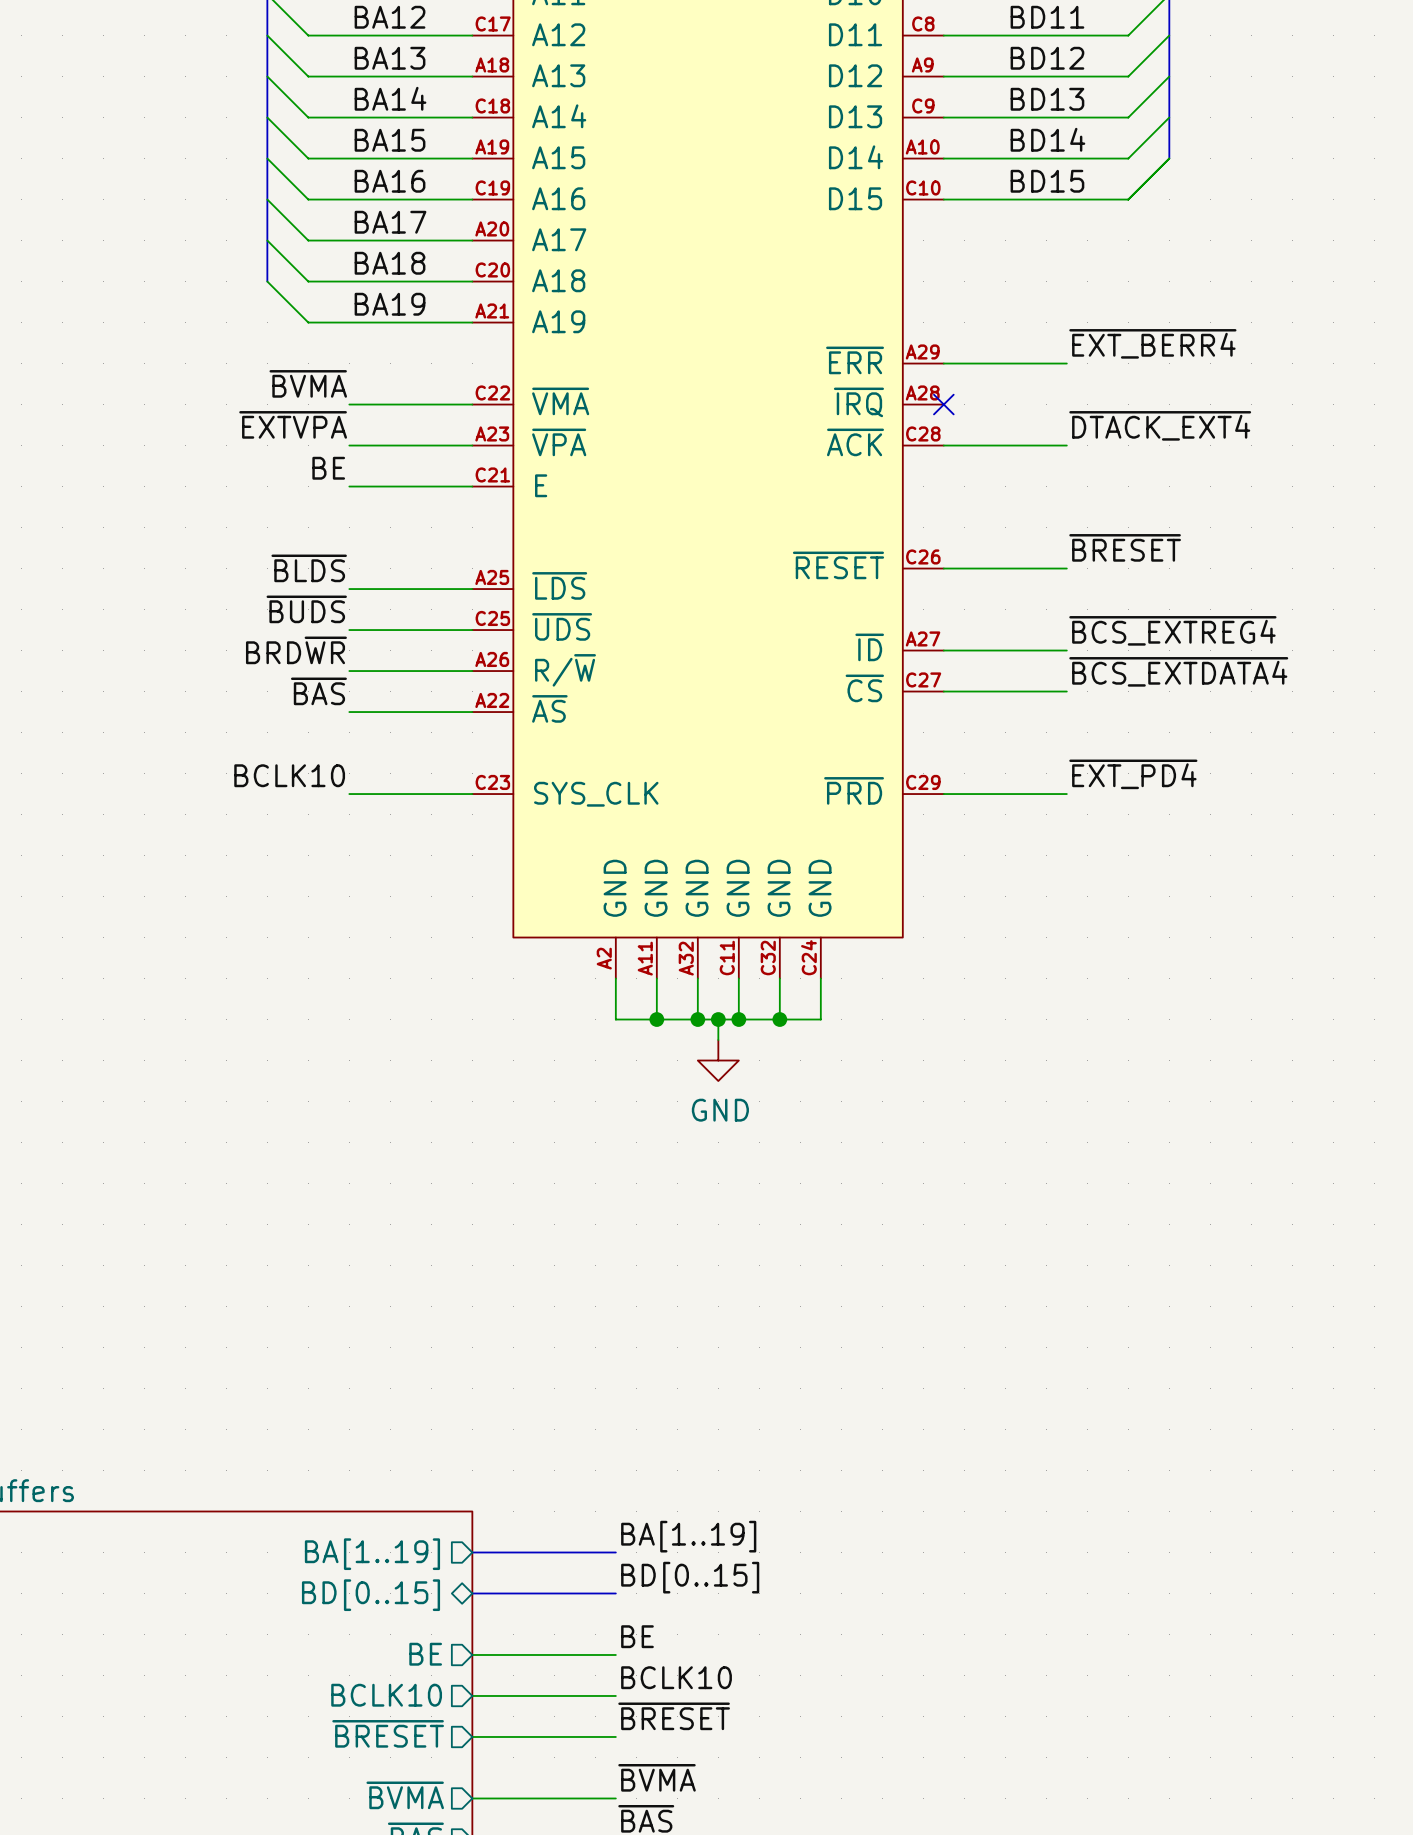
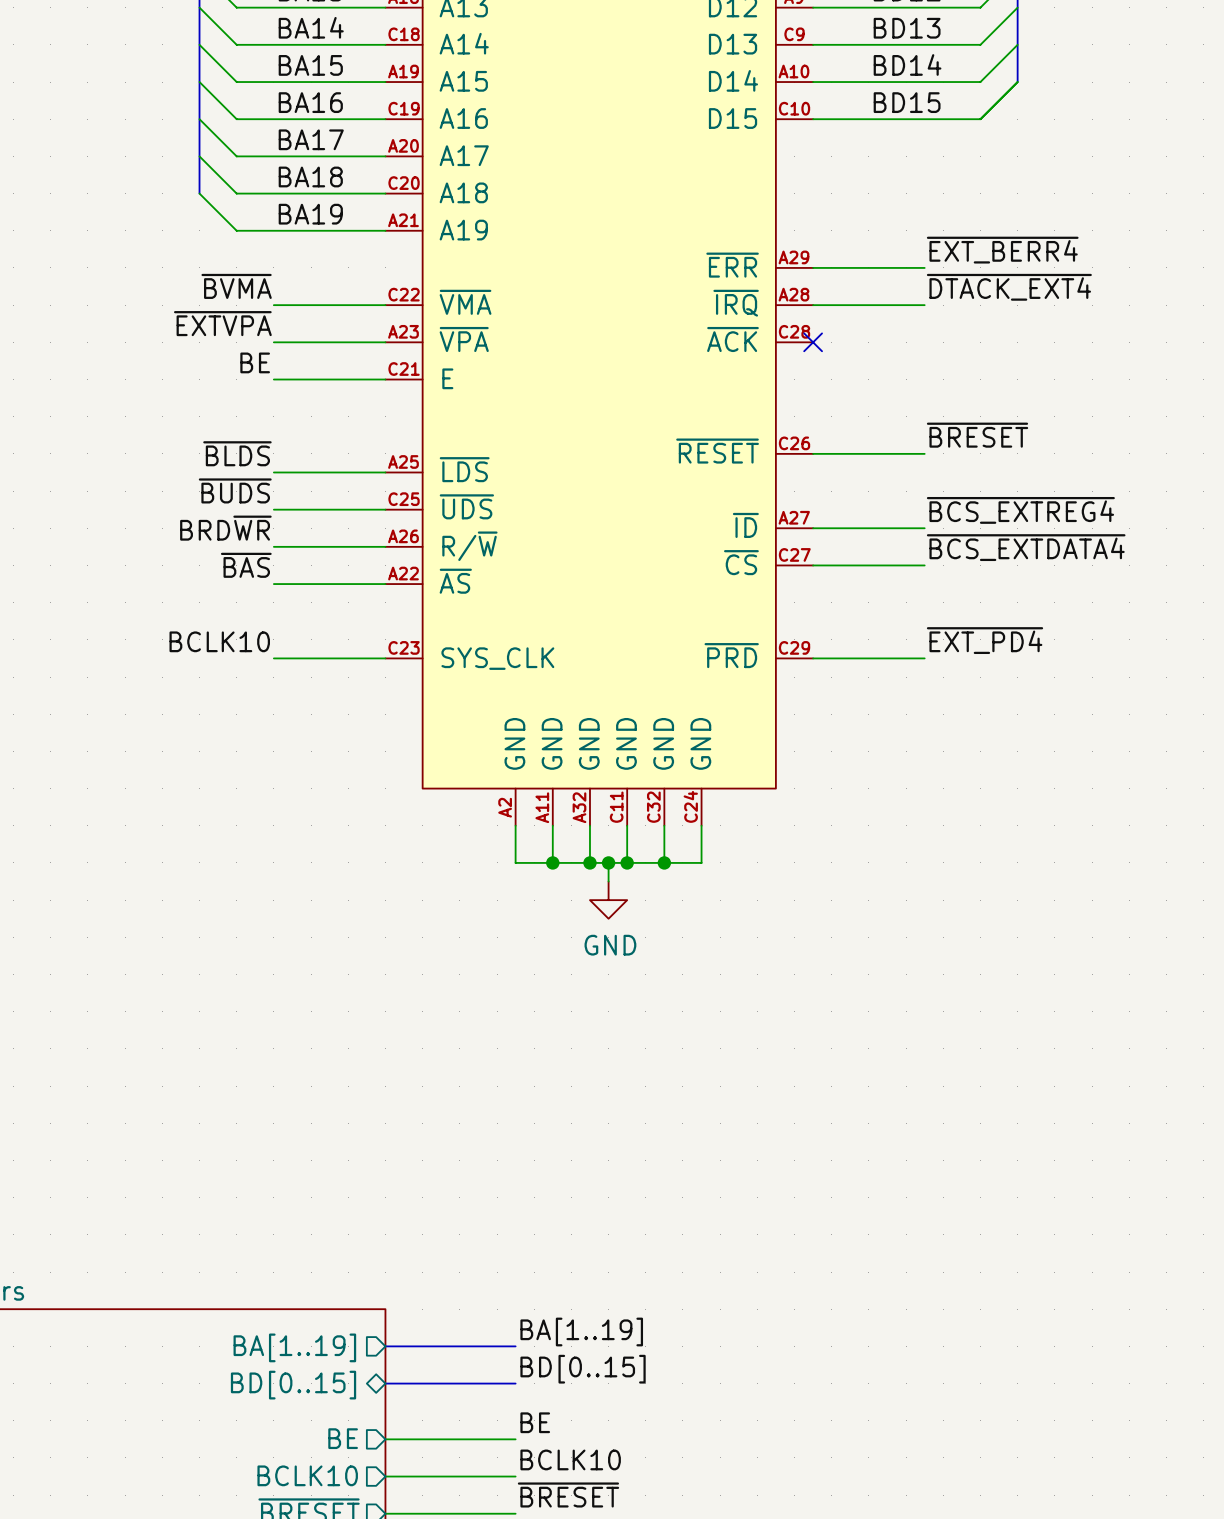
no-connect mark position: (943, 404) -> (813, 342)
label position: ~{DTACK_EXT4} (1160, 425) -> ~{DTACK_EXT4} (1009, 287)
wire: (943, 445) (1066, 445) -> (813, 305) (924, 305)

